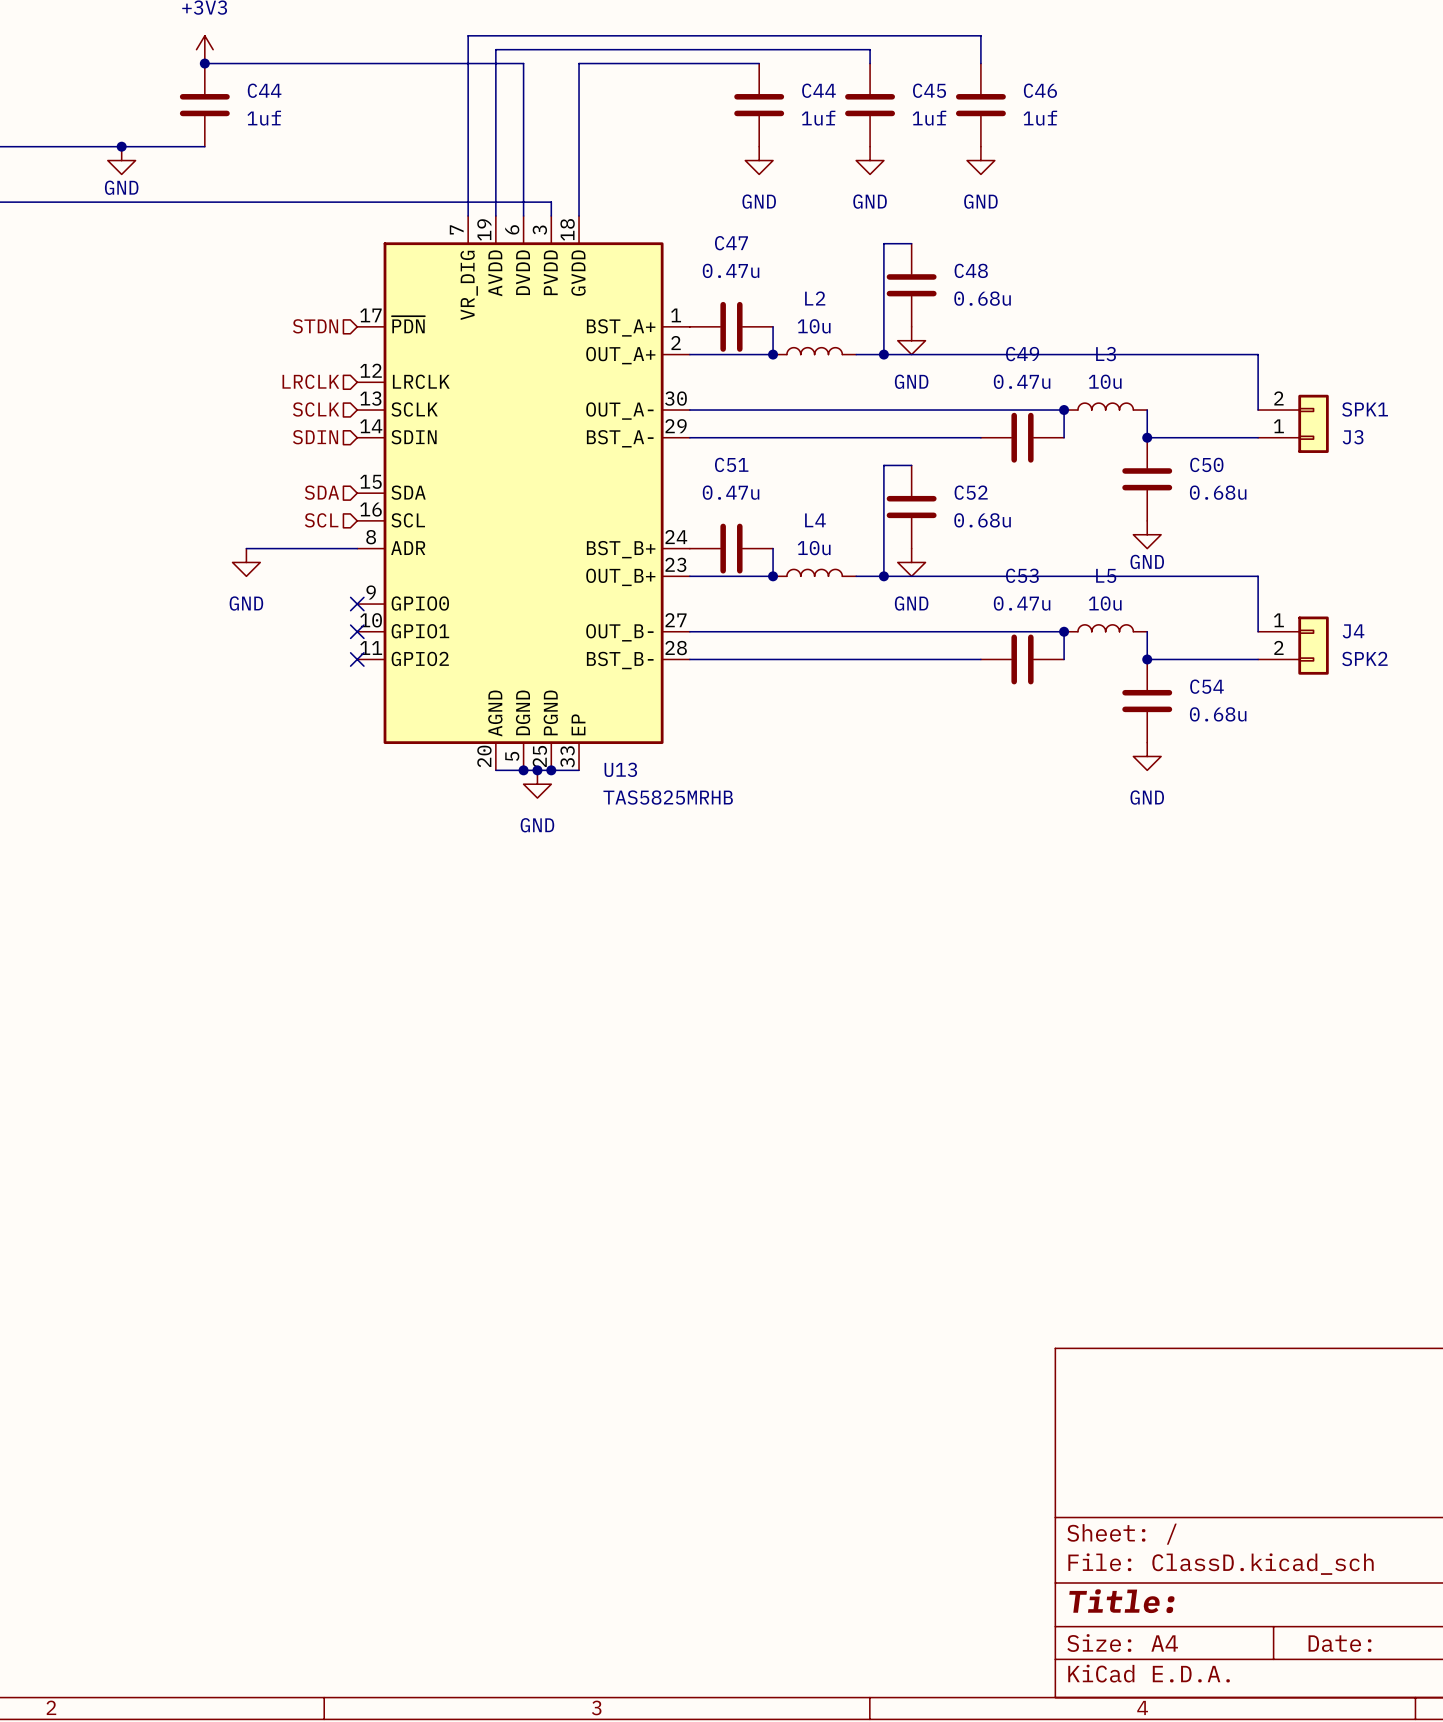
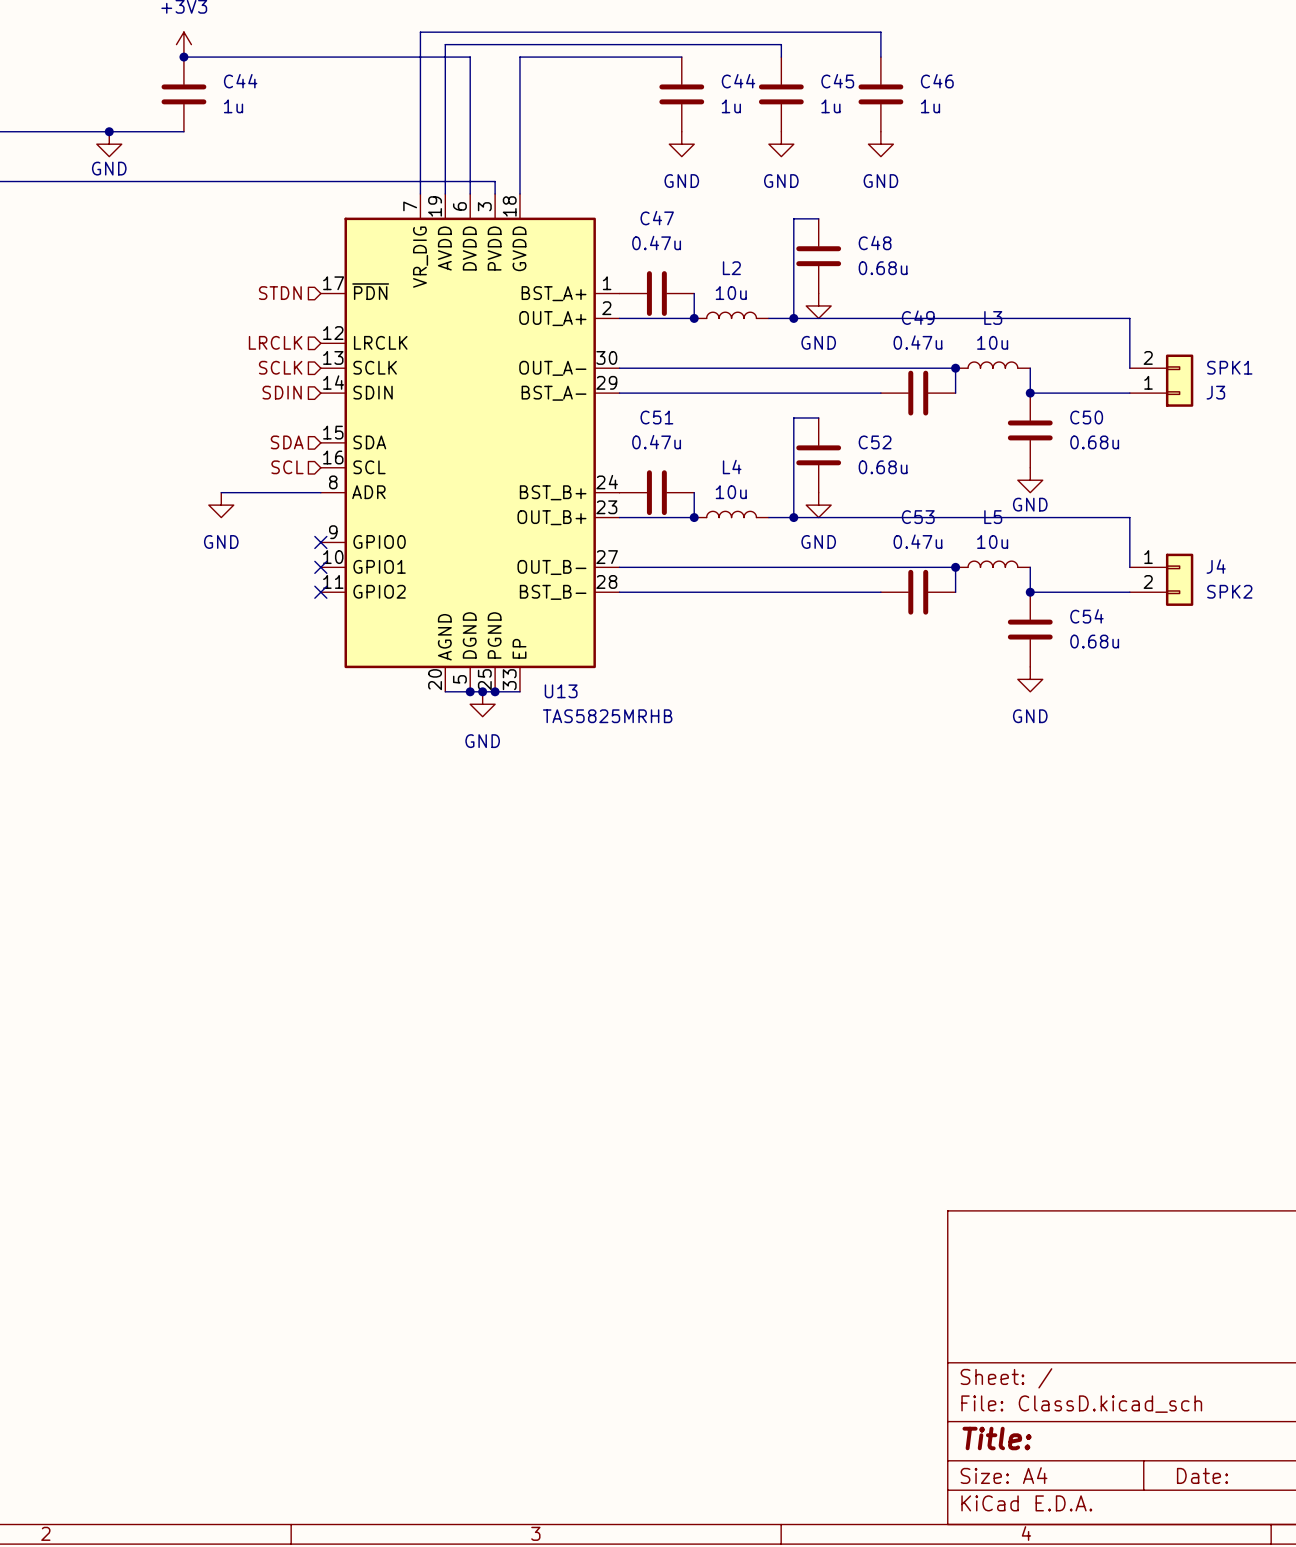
C44 value: 1uf (264, 118) -> 1u (233, 106)
C44 value: 1uf (818, 118) -> 1u (731, 106)
C45 value: 1uf (929, 118) -> 1u (830, 106)
C46 value: 1uf (1040, 118) -> 1u (930, 106)

